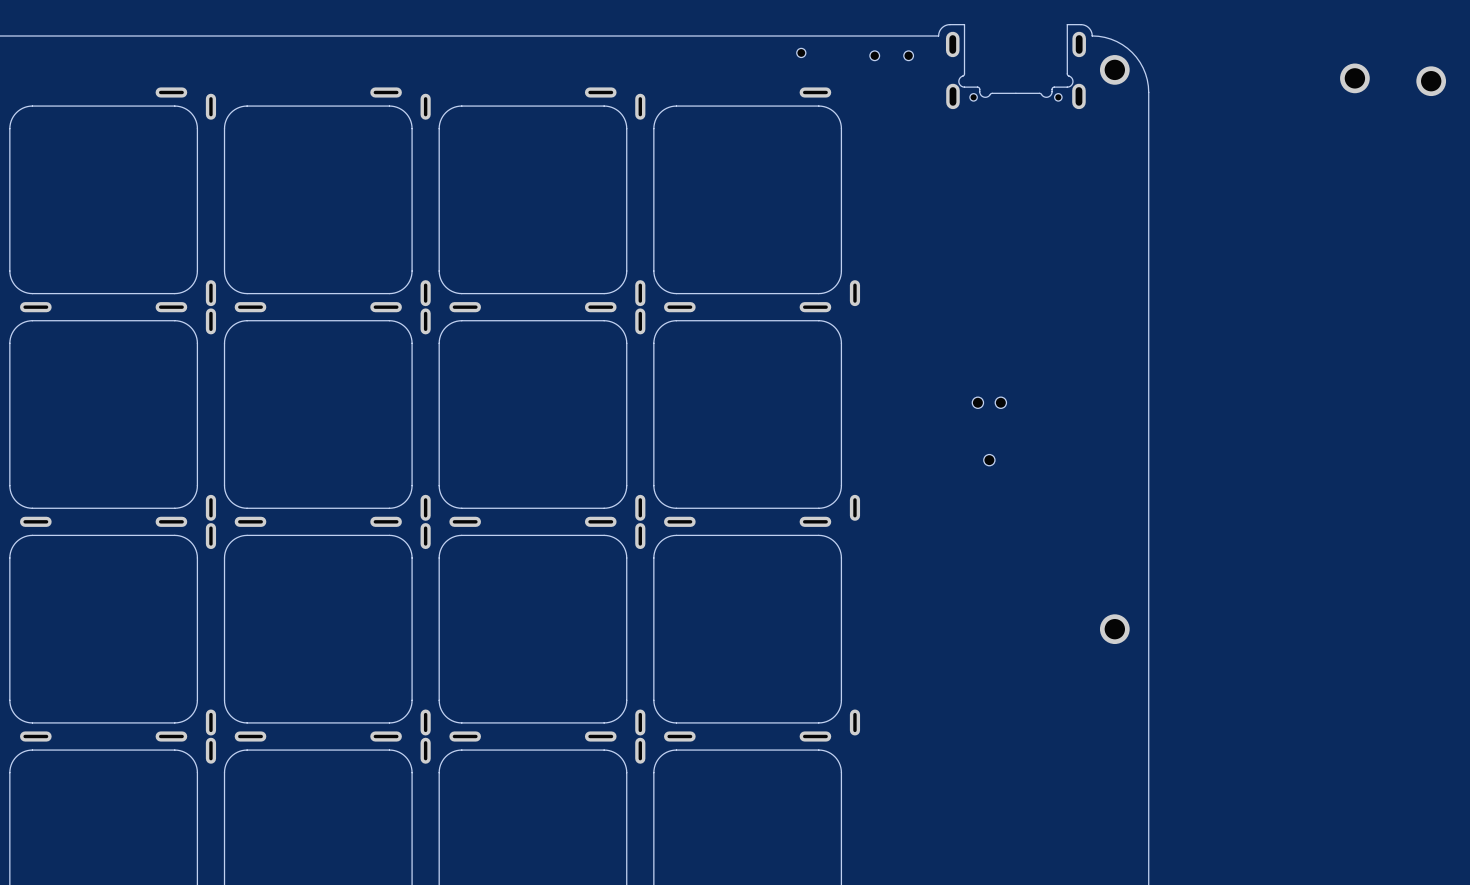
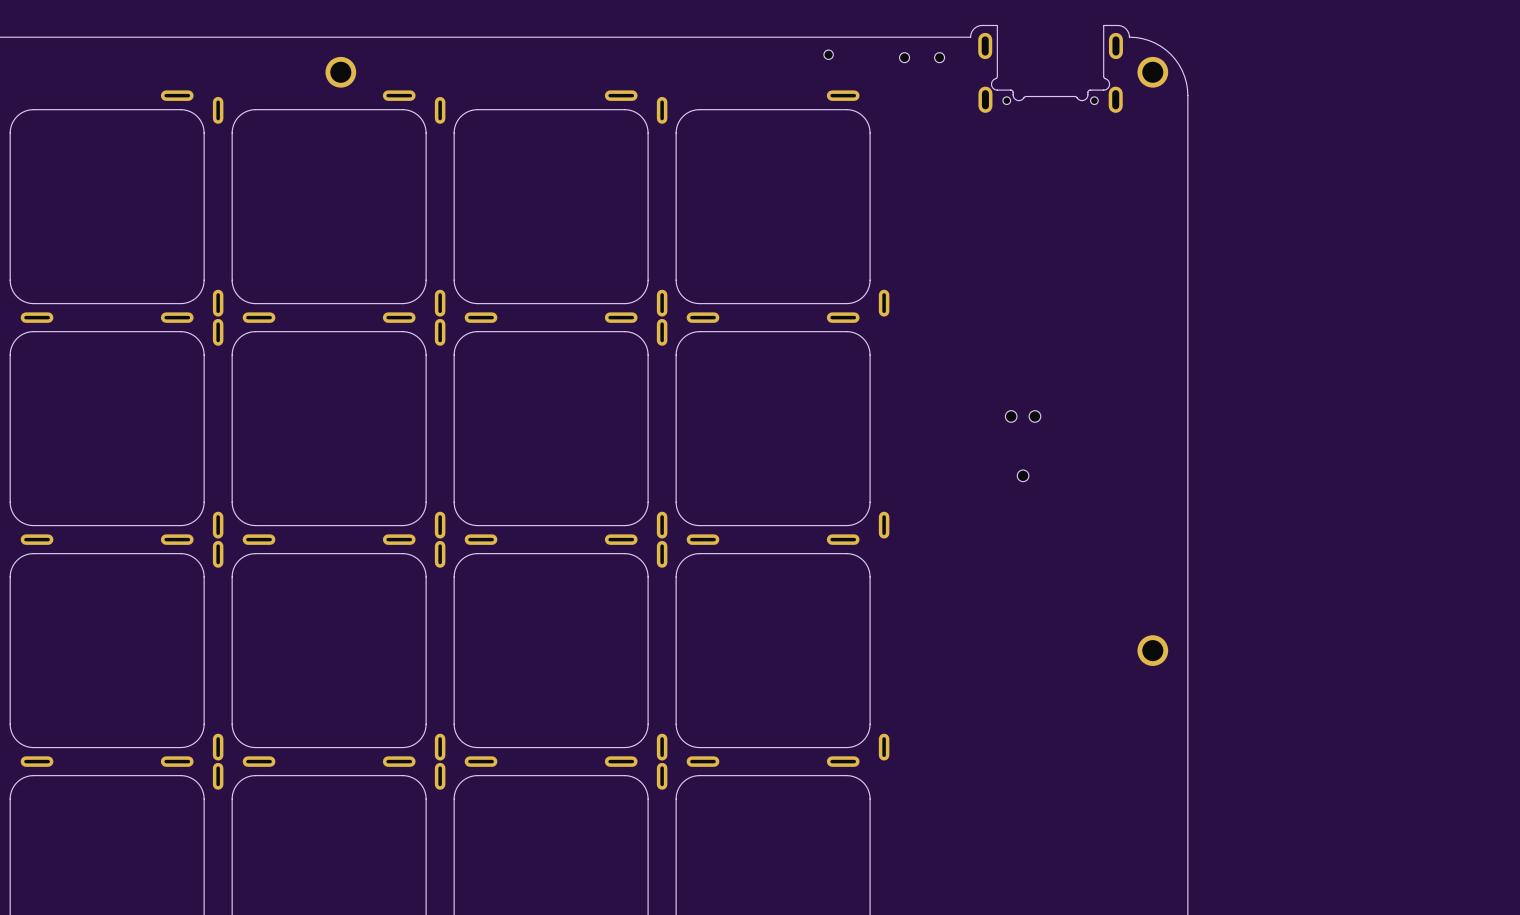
part: none -> (340, 72)
part: (1354, 78) -> none
part: (1431, 81) -> none

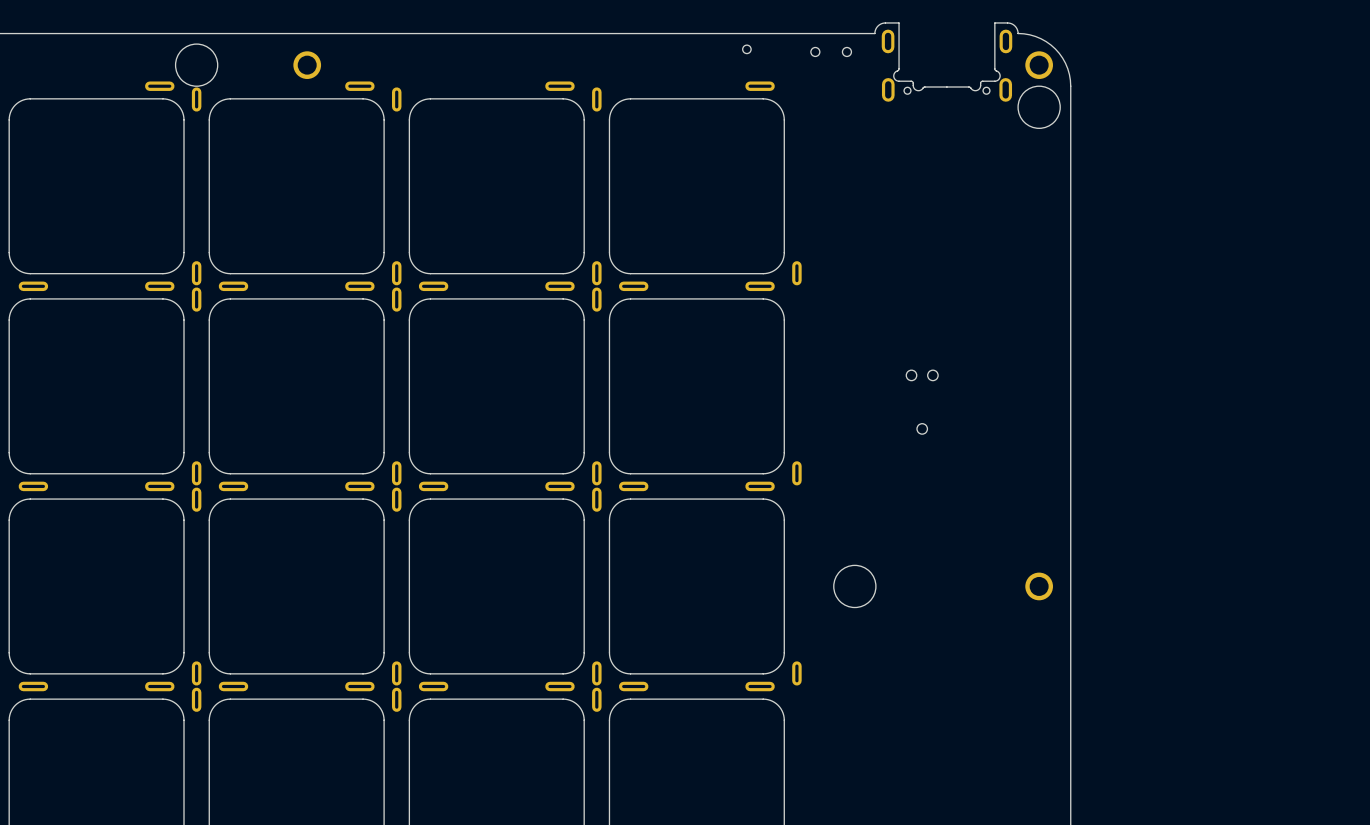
round board edge: none -> [175, 43, 219, 87]
round board edge: none -> [1017, 85, 1061, 129]
round board edge: none -> [833, 564, 877, 609]

